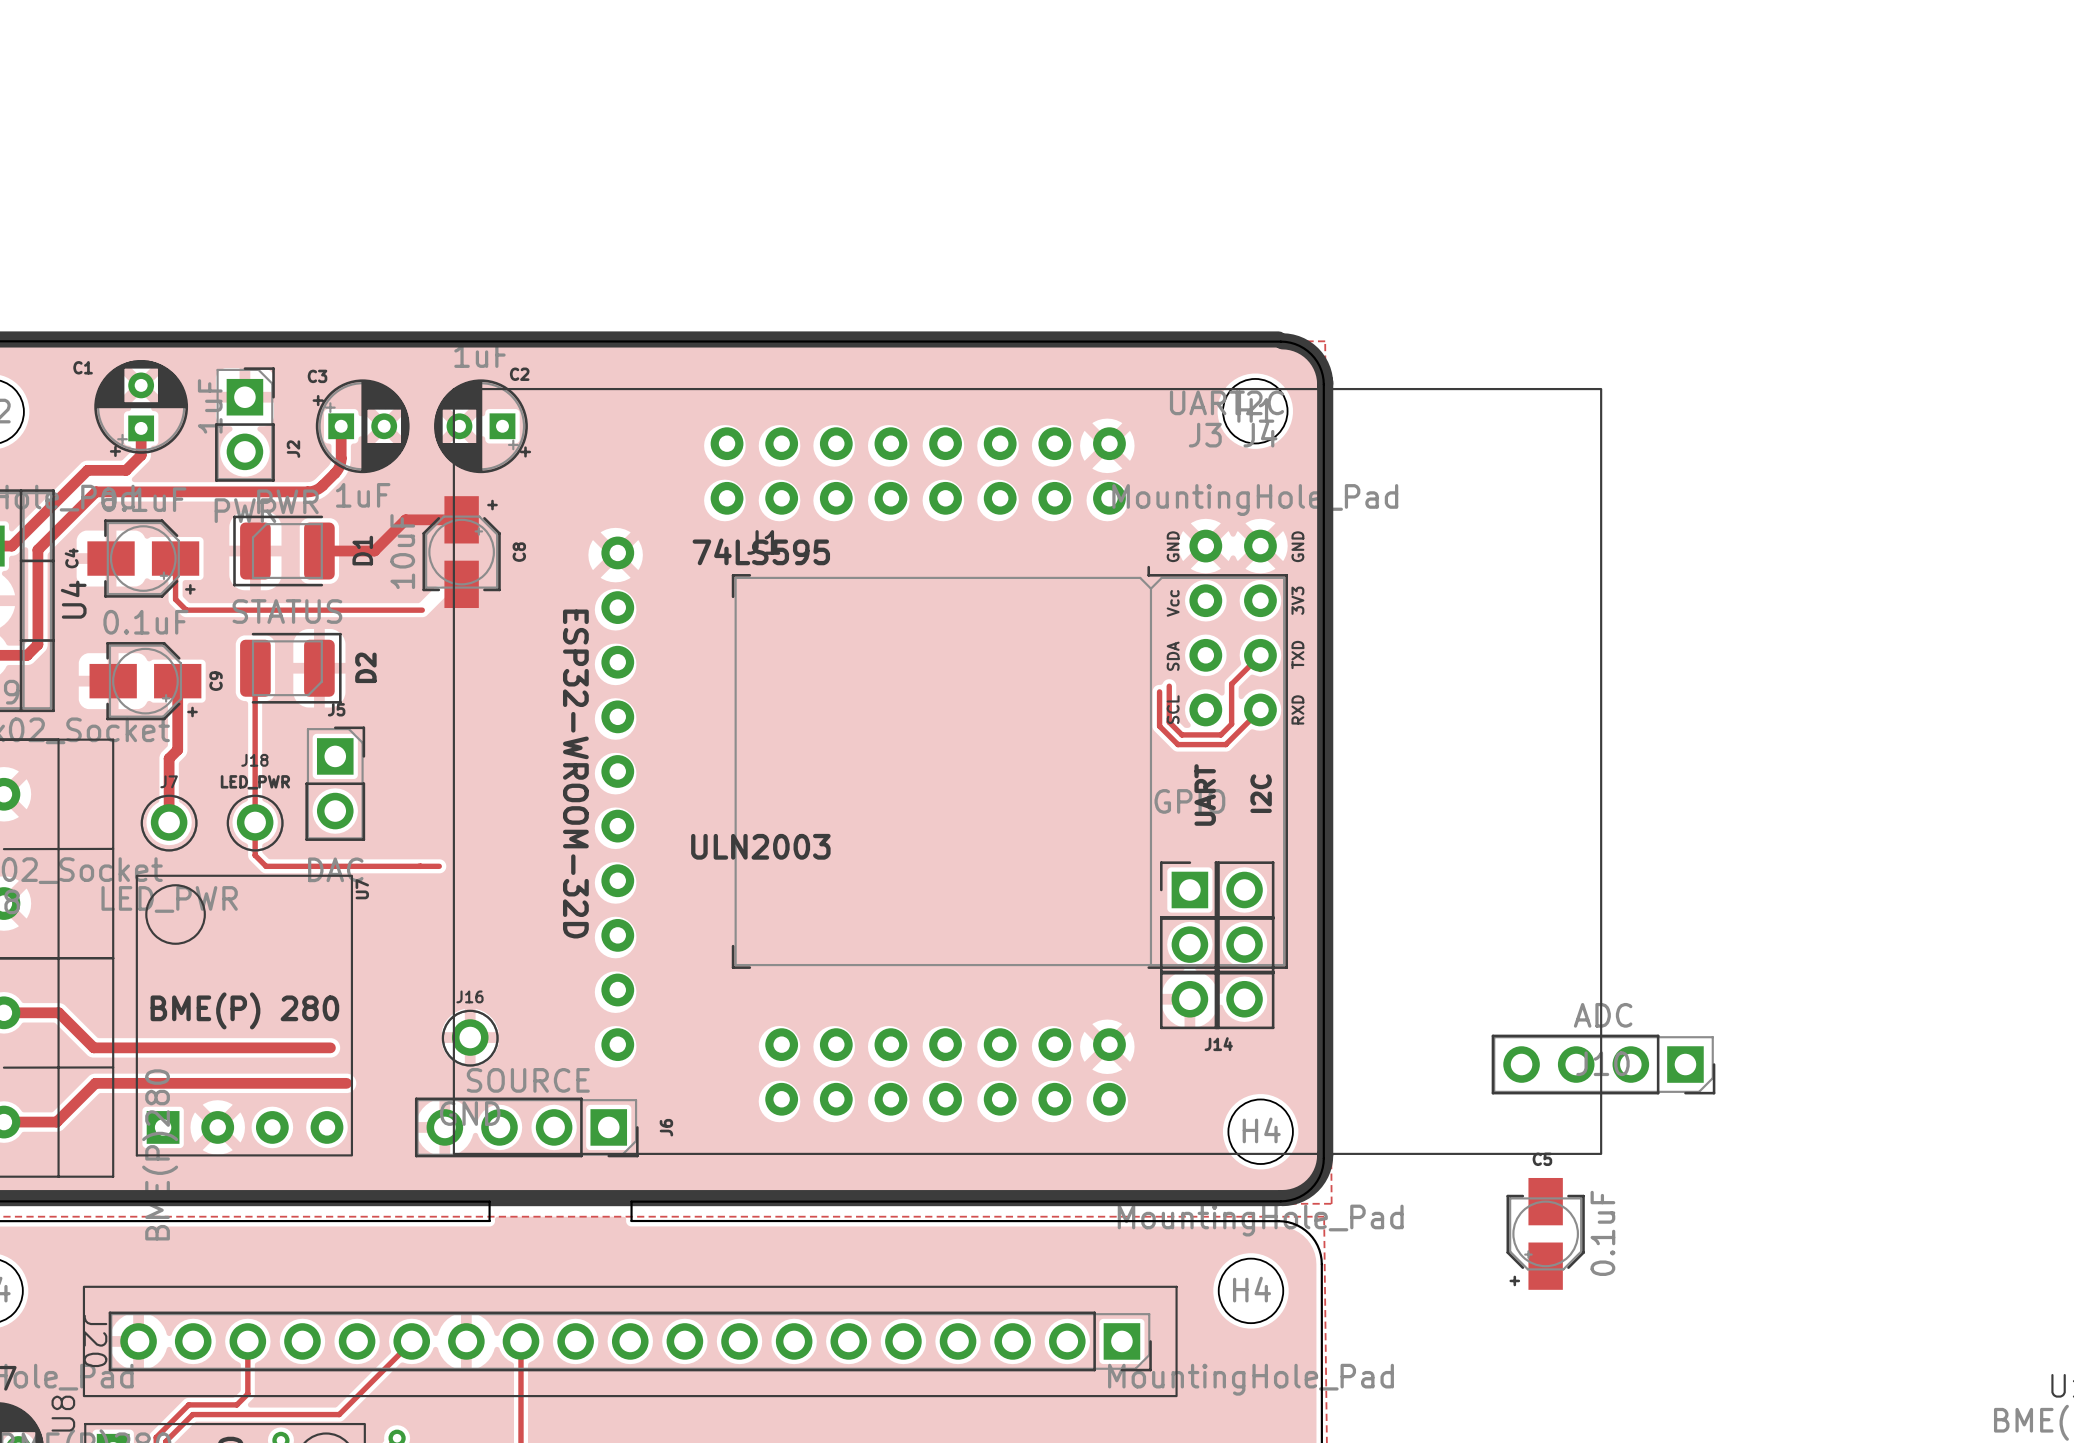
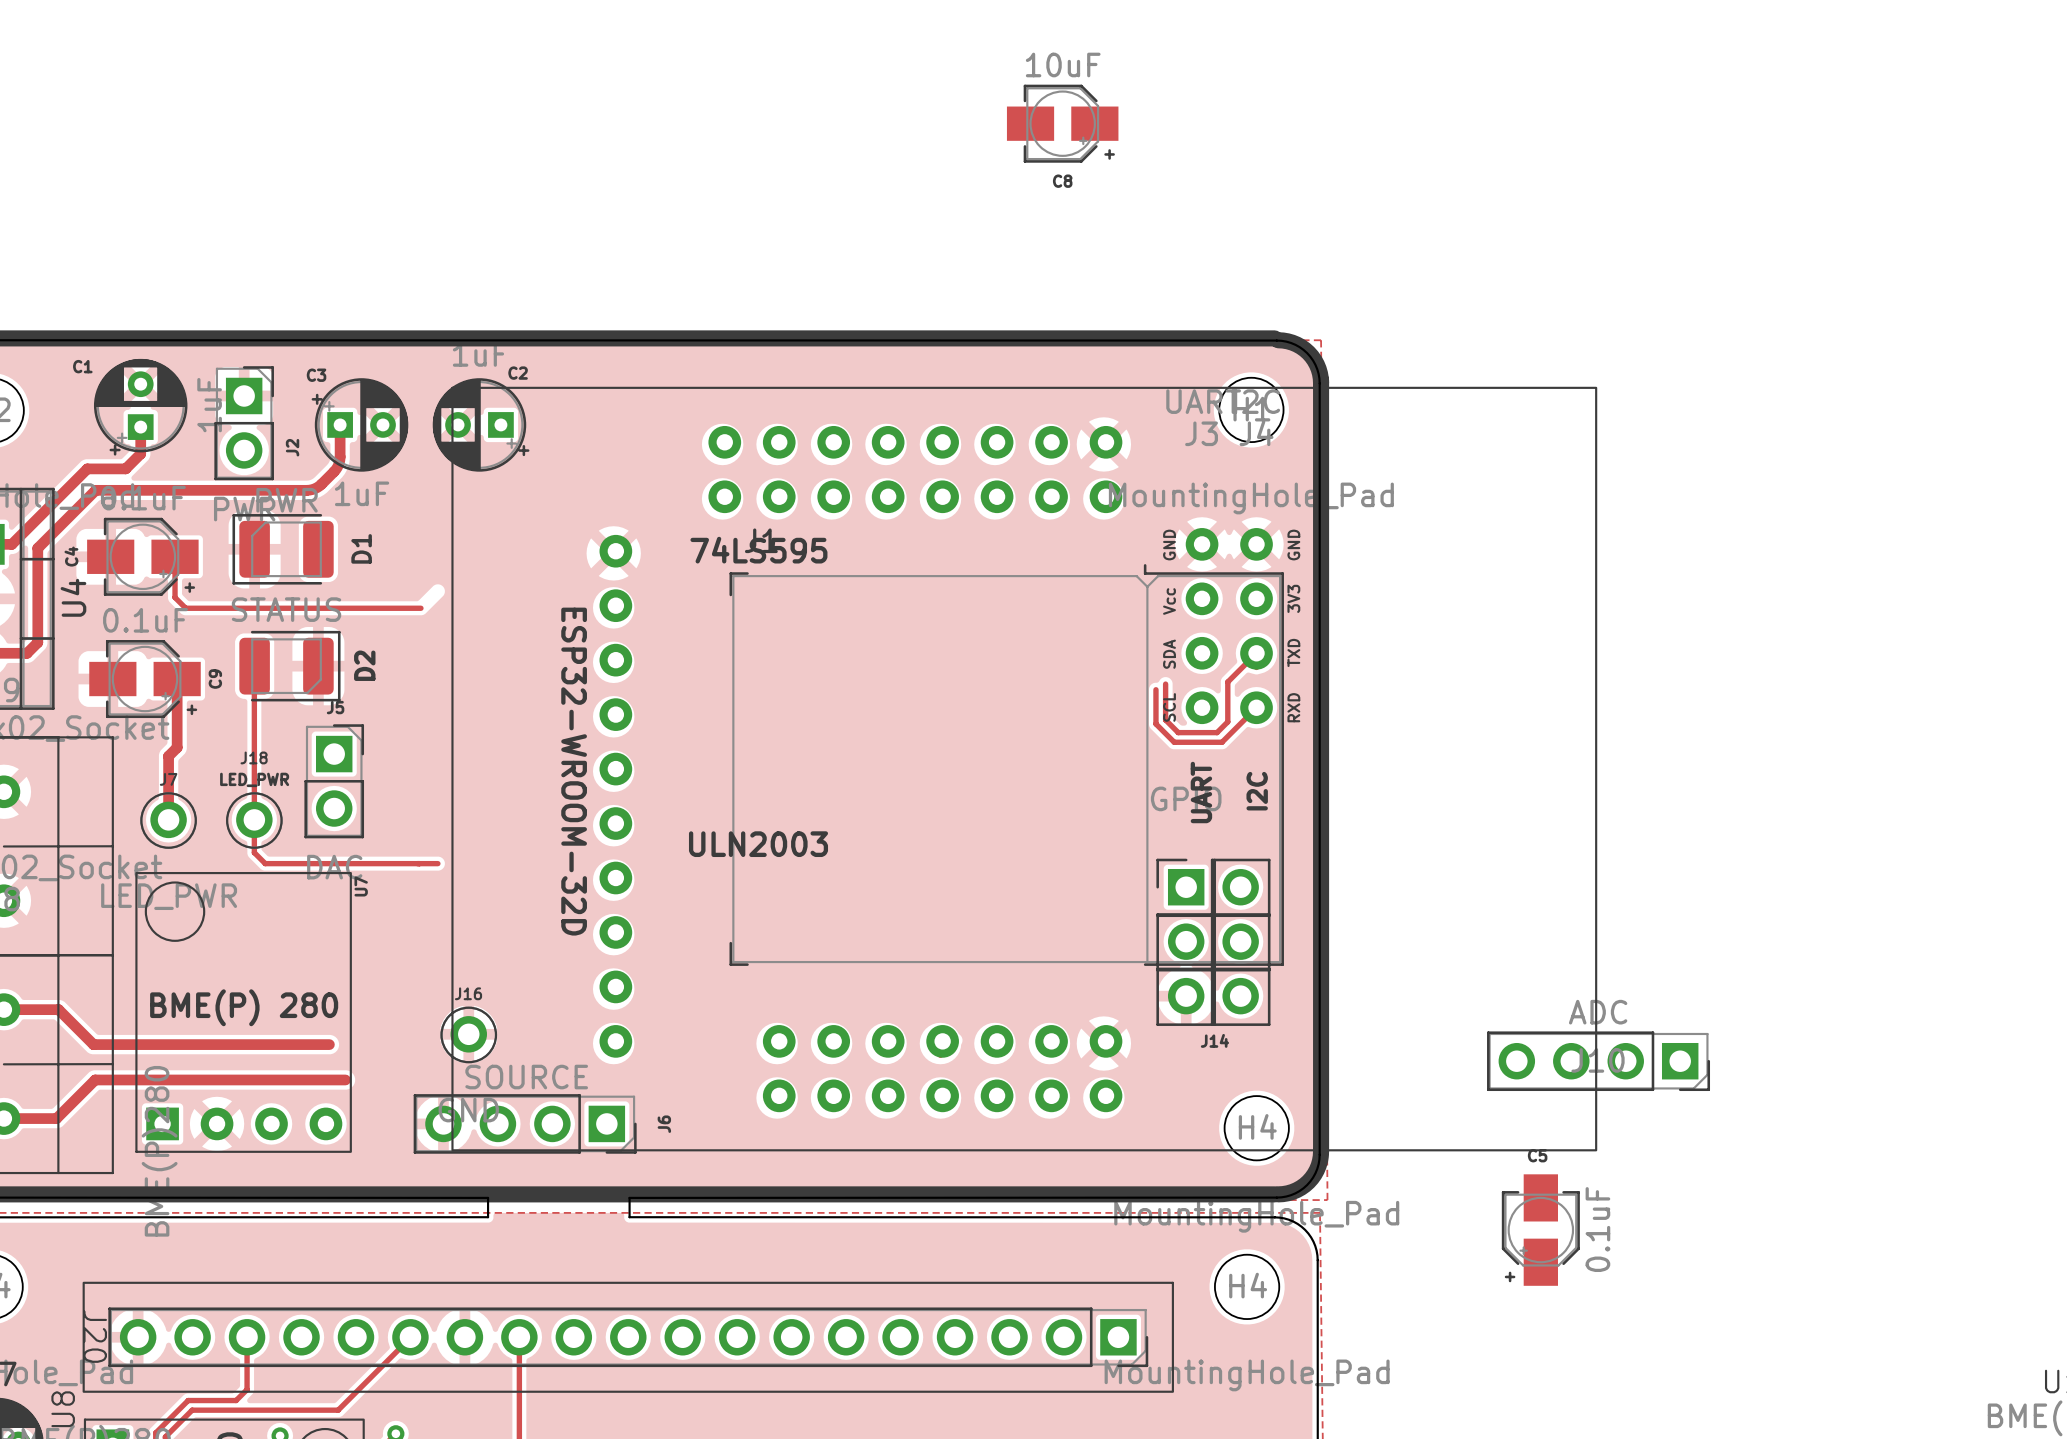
track: (461, 519) (405, 519) (374, 551) (319, 551) -> none
C8 rotation: 0° (461, 552) -> 90° clockwise (1062, 123)
C8 position: (461, 552) -> (1062, 123)

